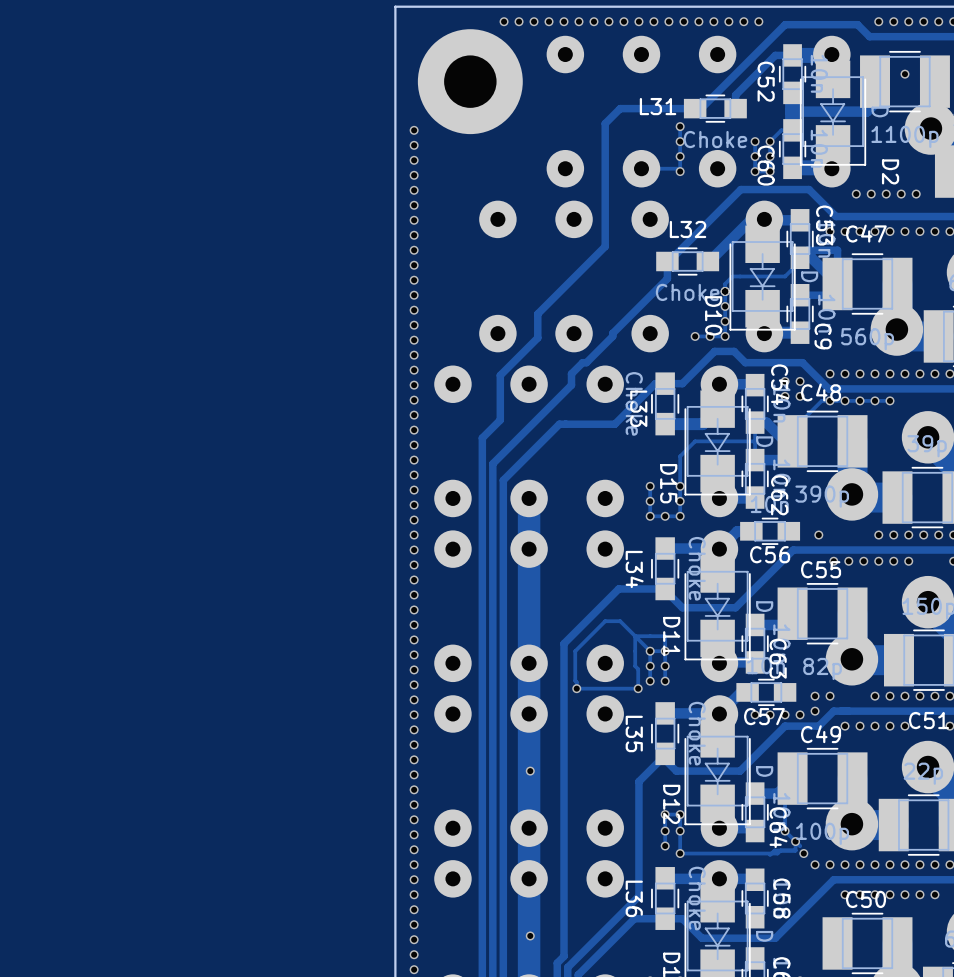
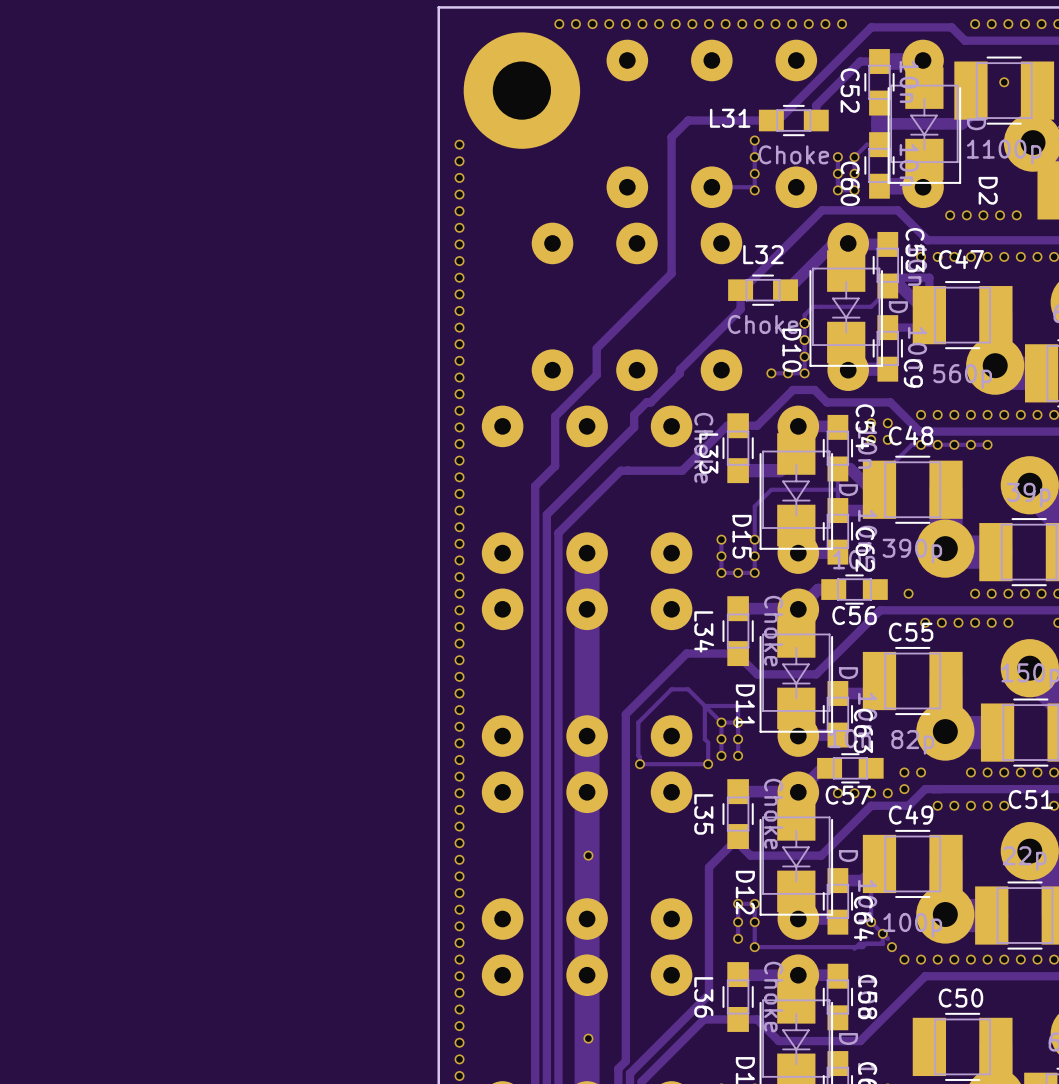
via: (845, 894) -> none
via: (860, 894) -> none
via: (875, 894) -> none
via: (889, 894) -> none
via: (904, 894) -> none
via: (919, 894) -> none
via: (934, 894) -> none

